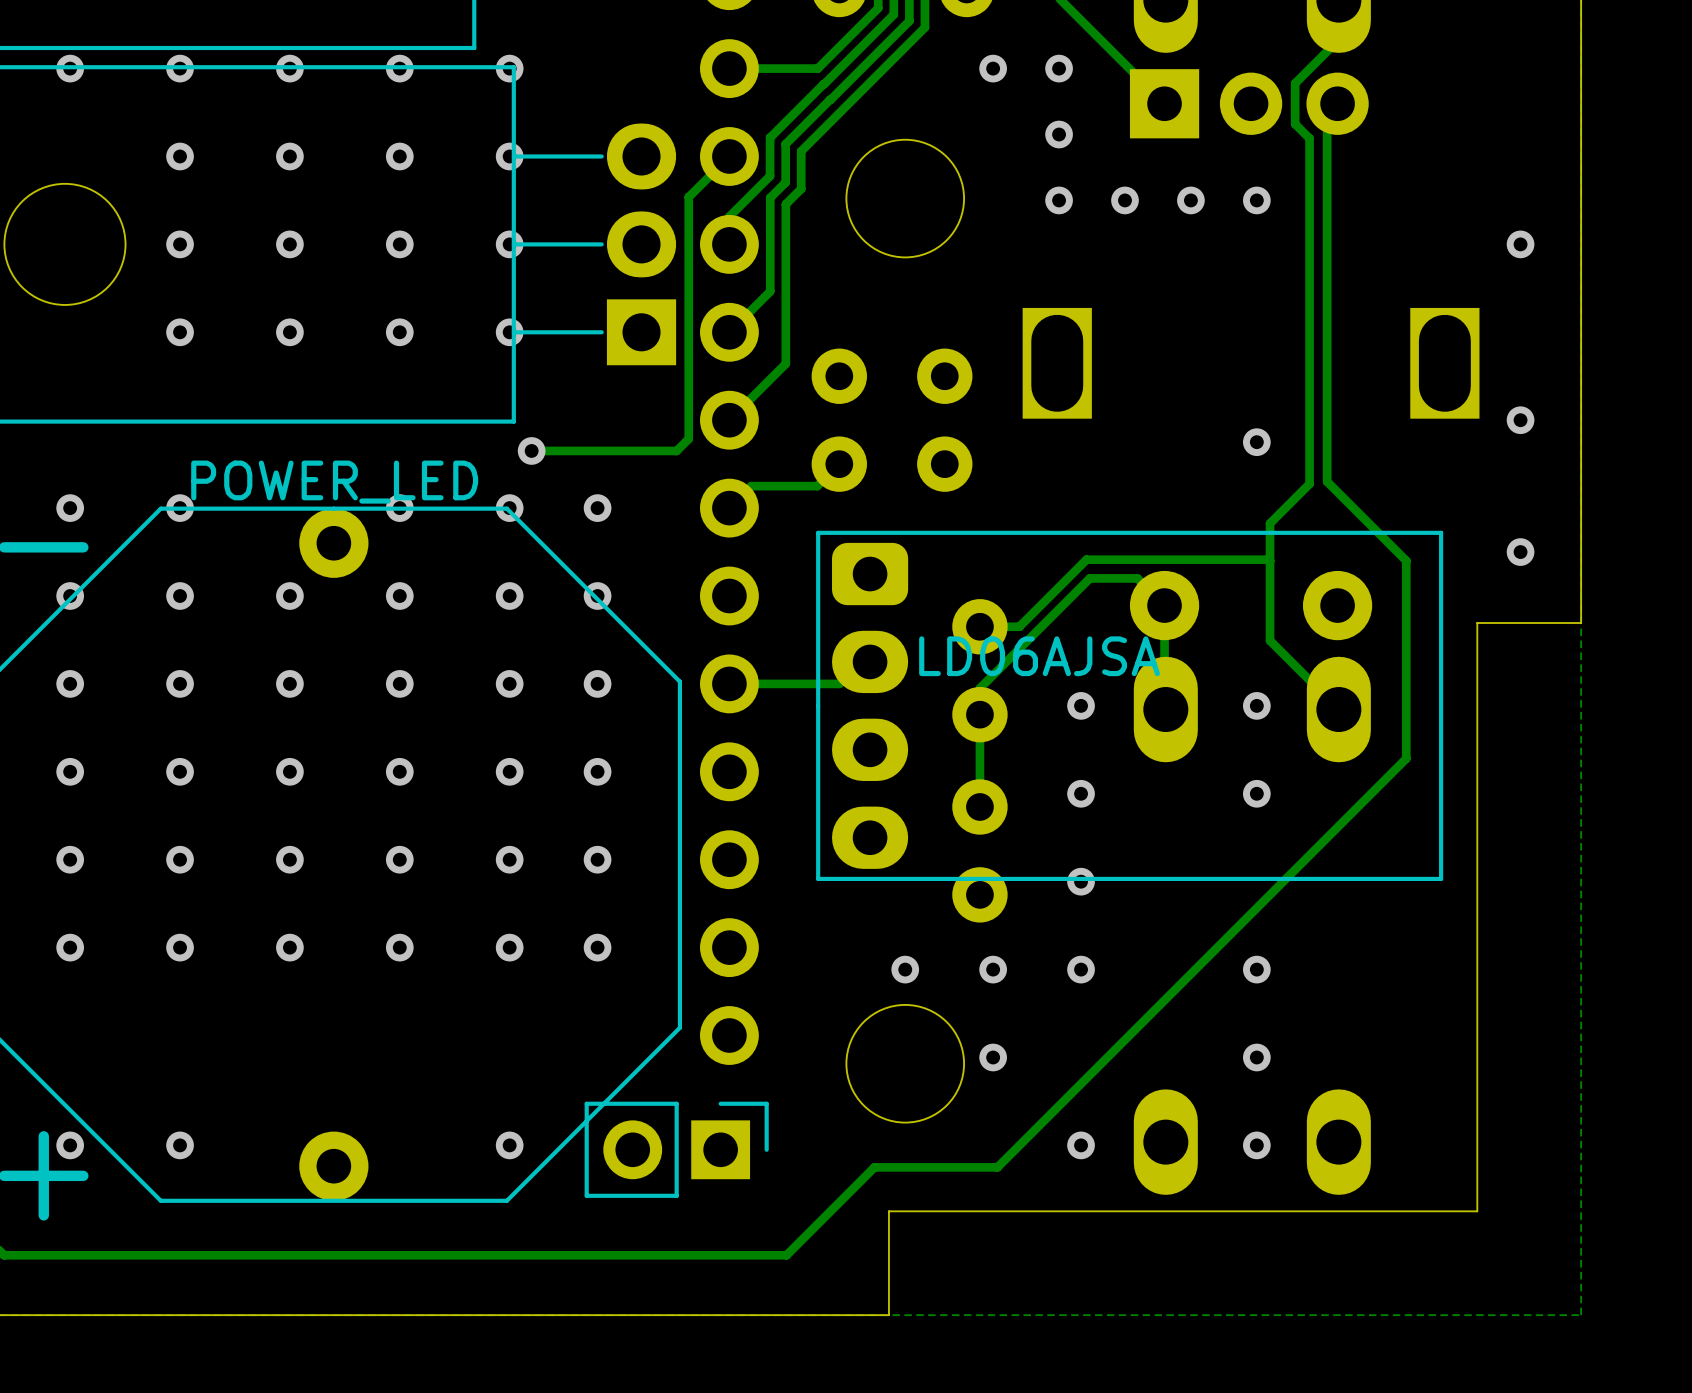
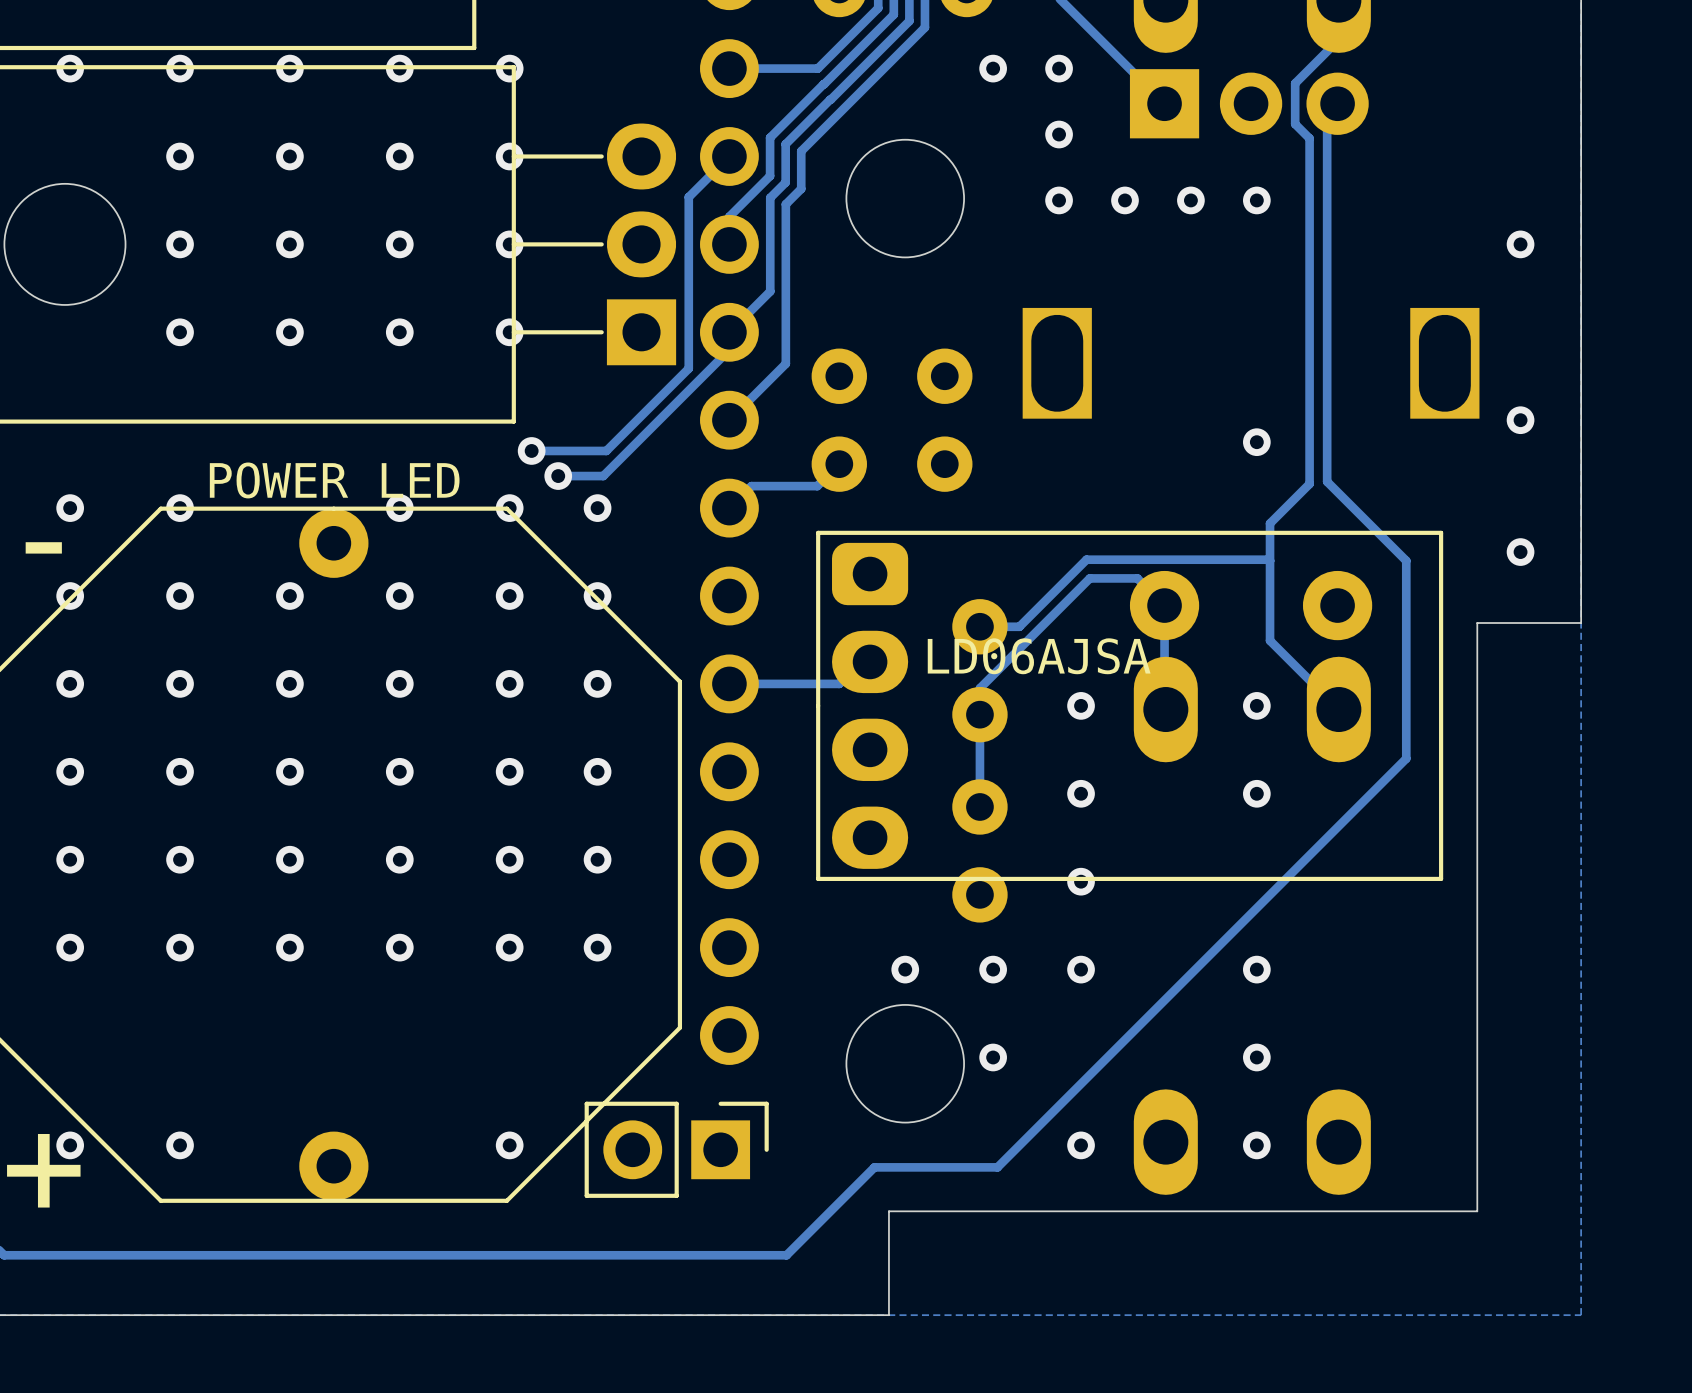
track: none -> (729, 332) (729, 349) (603, 476) (558, 476)
track: (688, 368) (688, 438) (676, 450) (606, 450) -> (688, 368) (606, 450)
via: none -> (558, 476)

